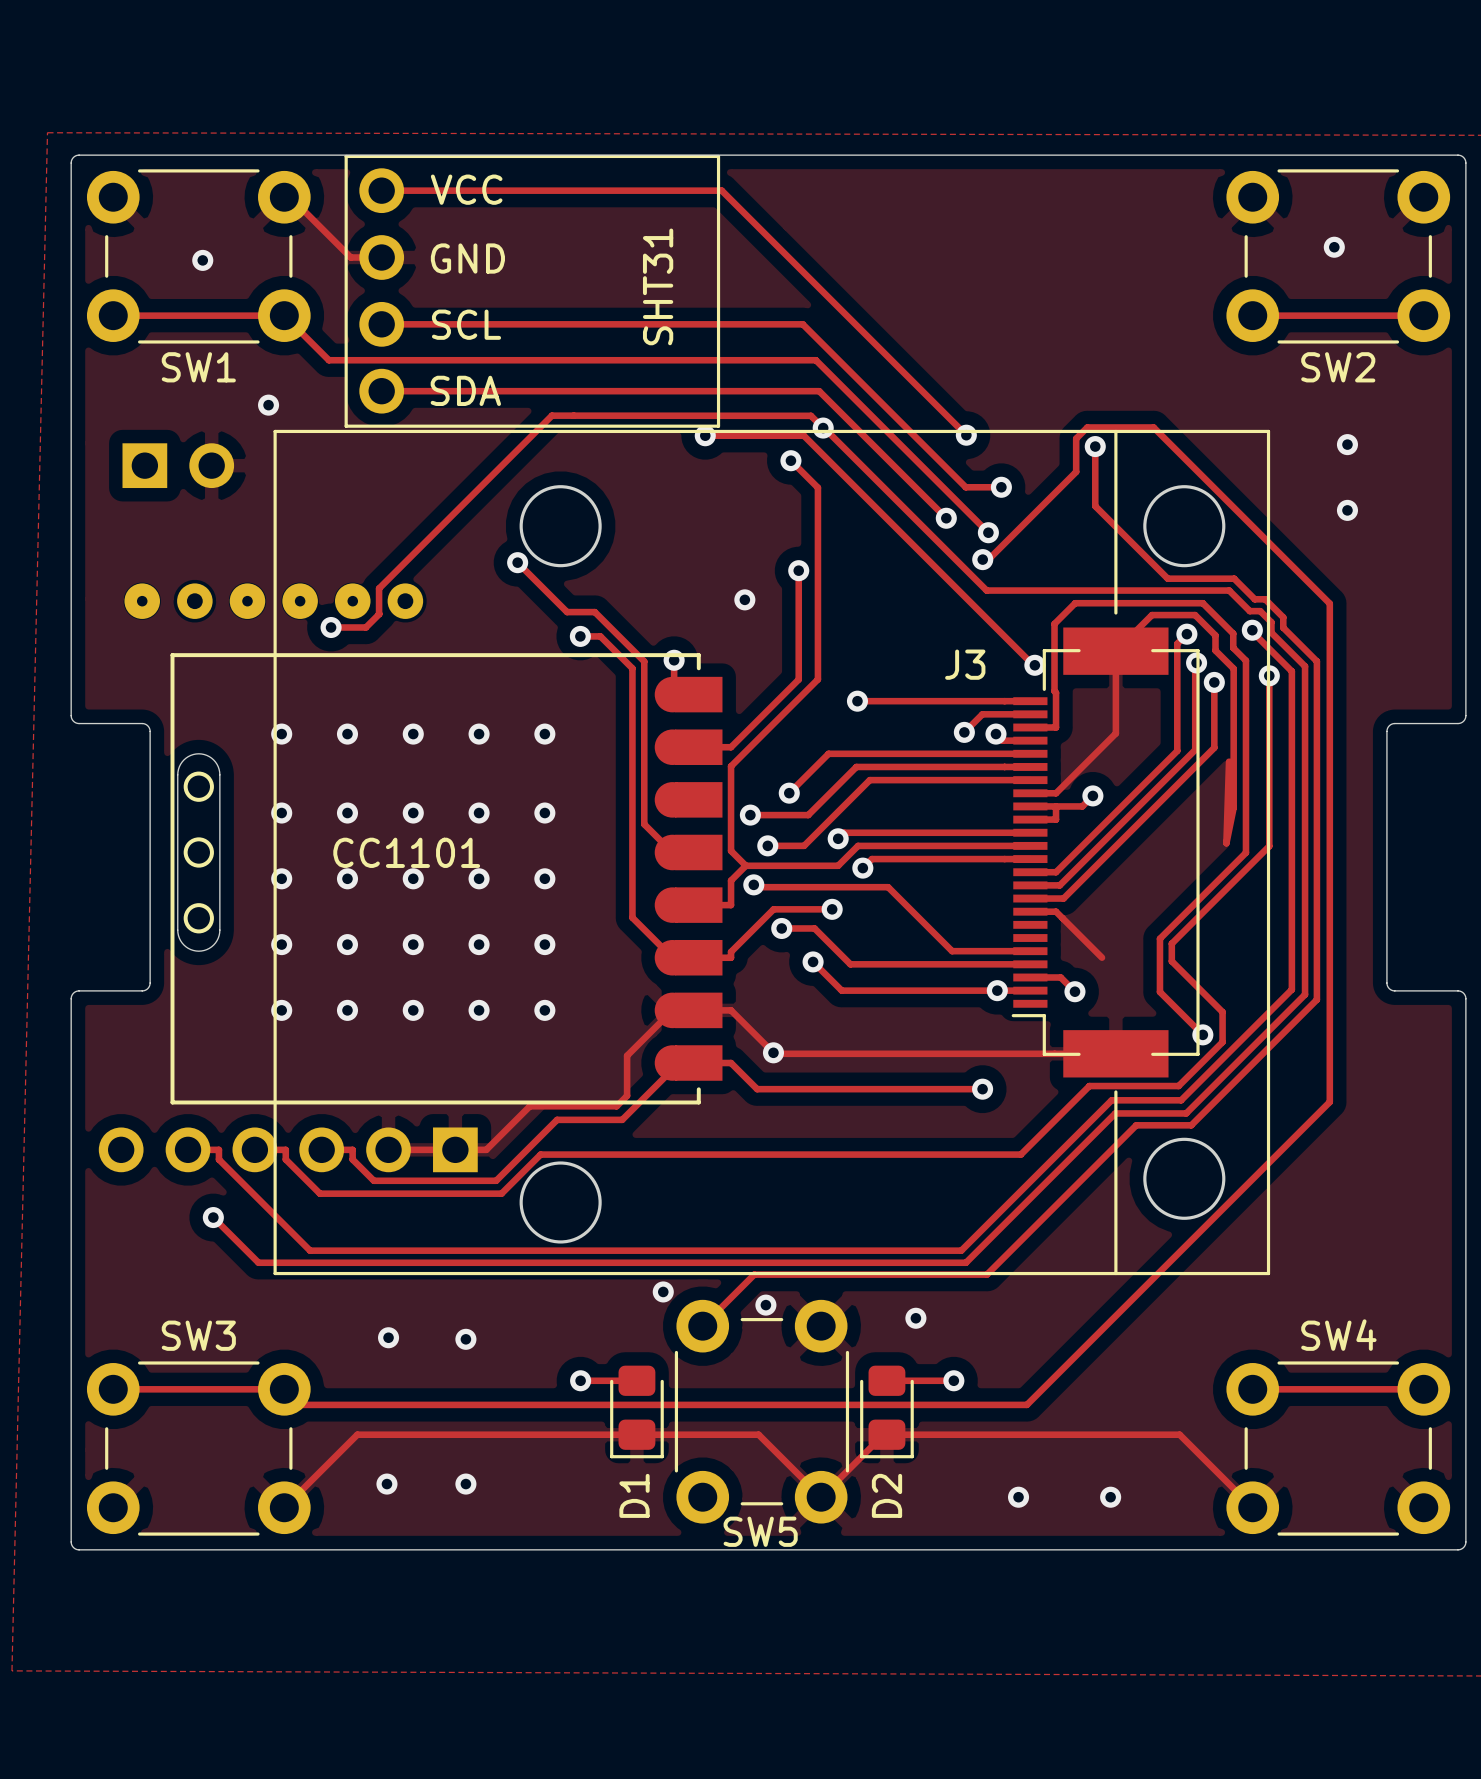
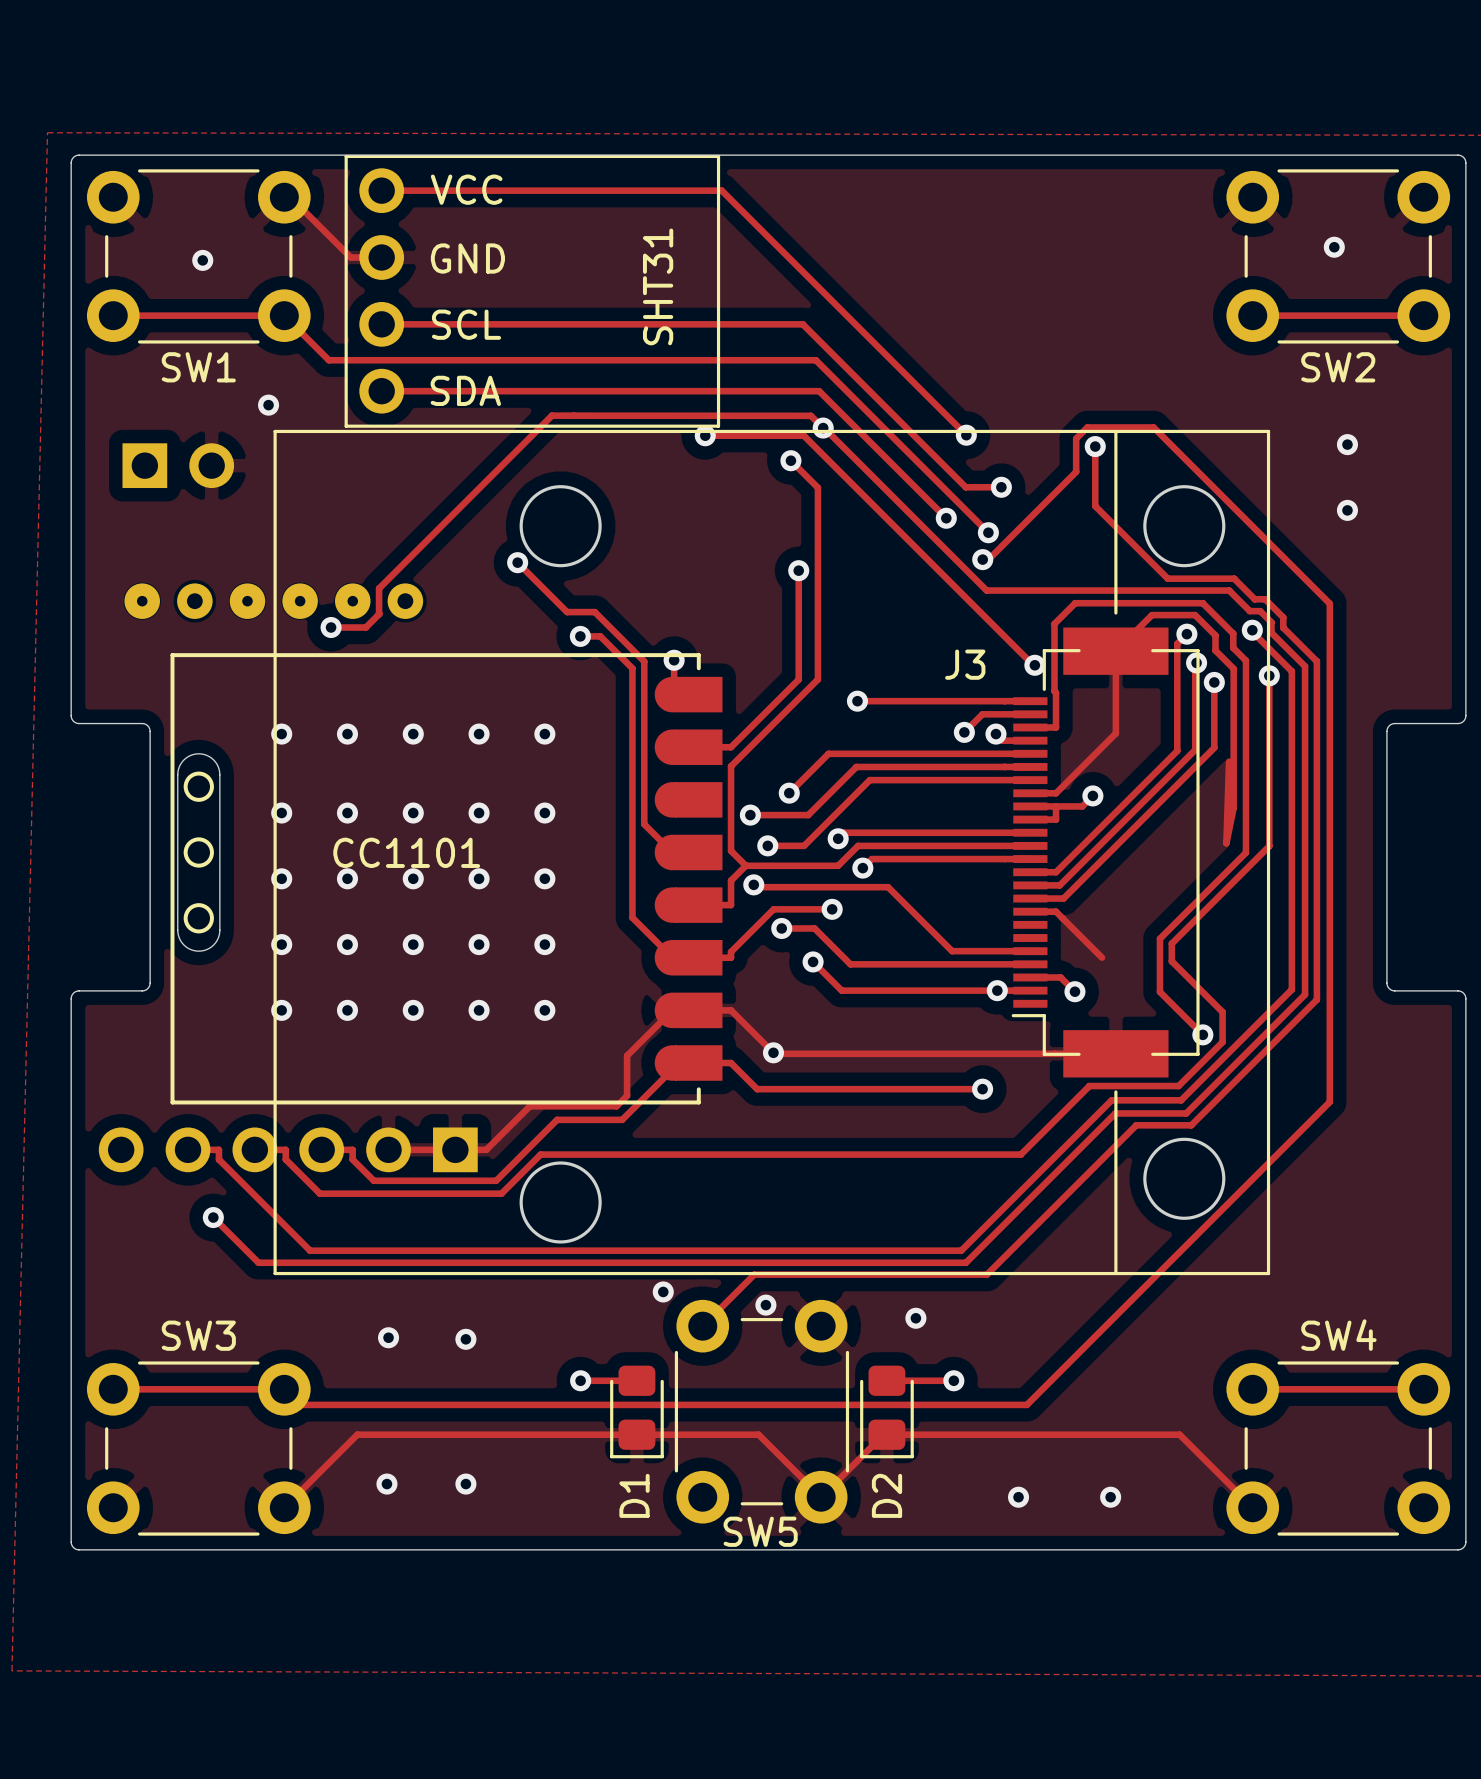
via: (744, 599) -> none

